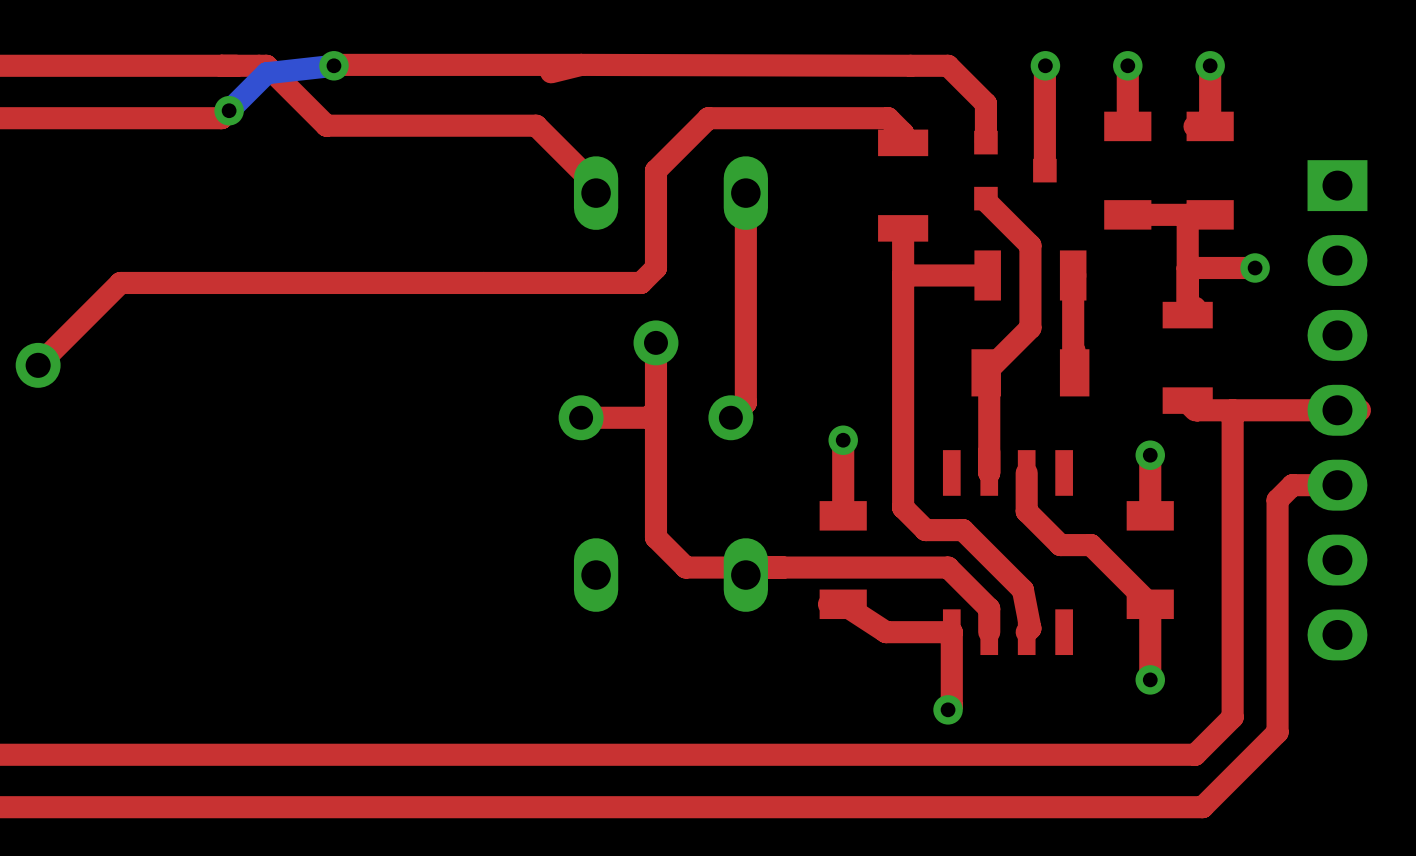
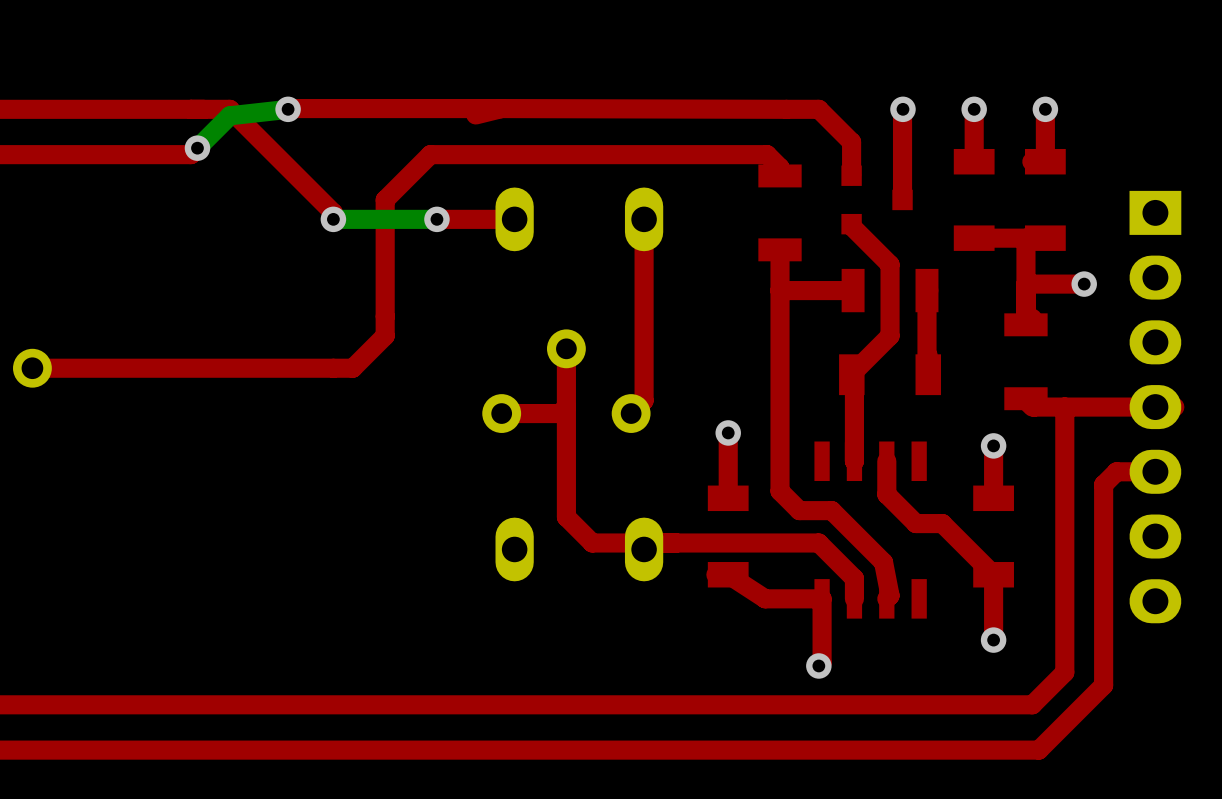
top track: (708, 118) (655, 170) (655, 267) (641, 282) (120, 282) (38, 365) -> (611, 154) (430, 154) (385, 199) (385, 335) (352, 368) (32, 368)
top track: (326, 125) (536, 125) (596, 185) (596, 193) -> (281, 161) (333, 212) (333, 219)
via: none -> (333, 219)
bottom track: none -> (436, 219) (333, 219)
via: none -> (436, 219)
top track: none -> (508, 219) (436, 219)

